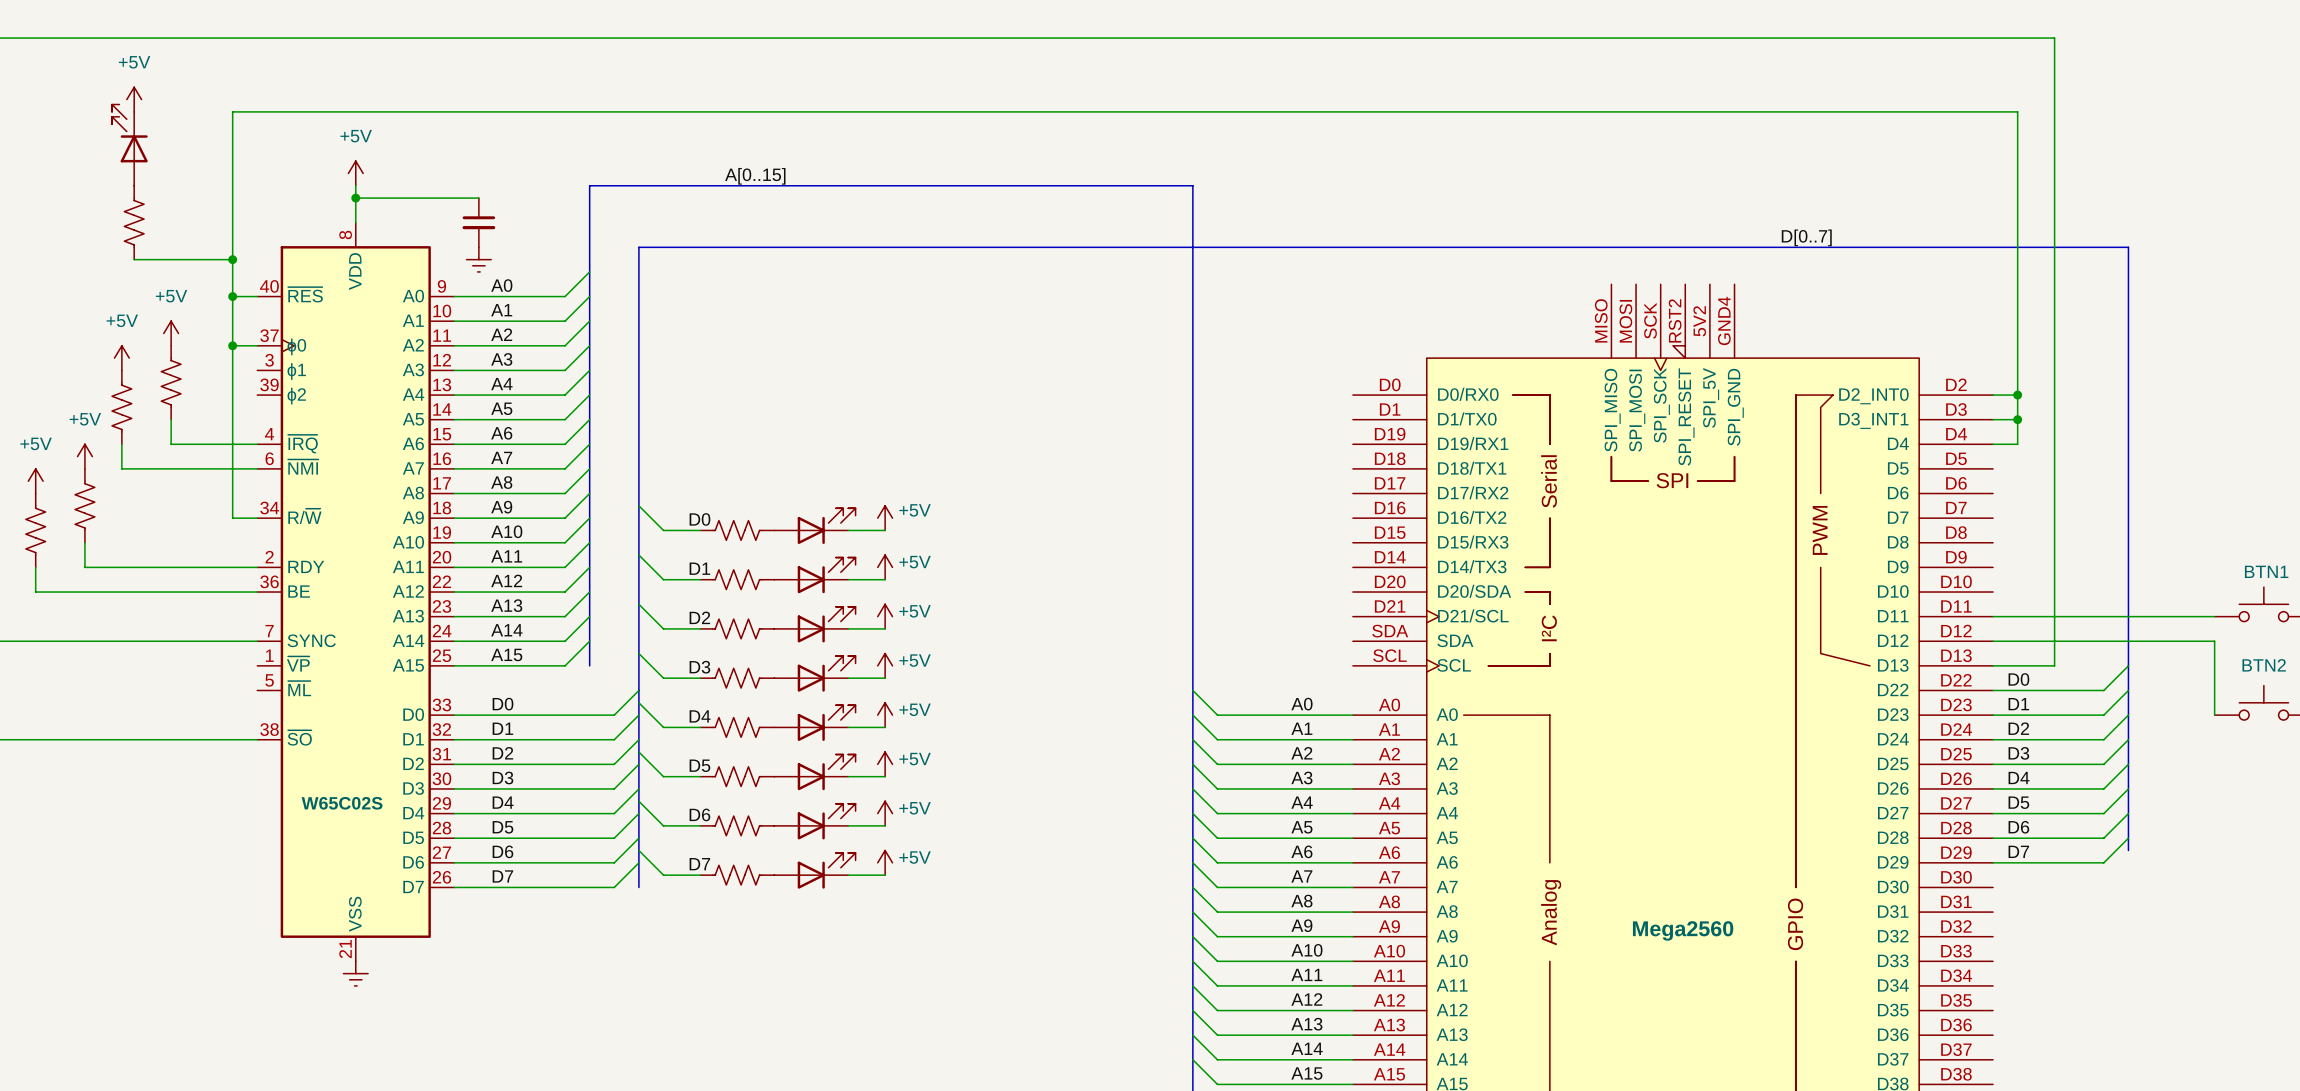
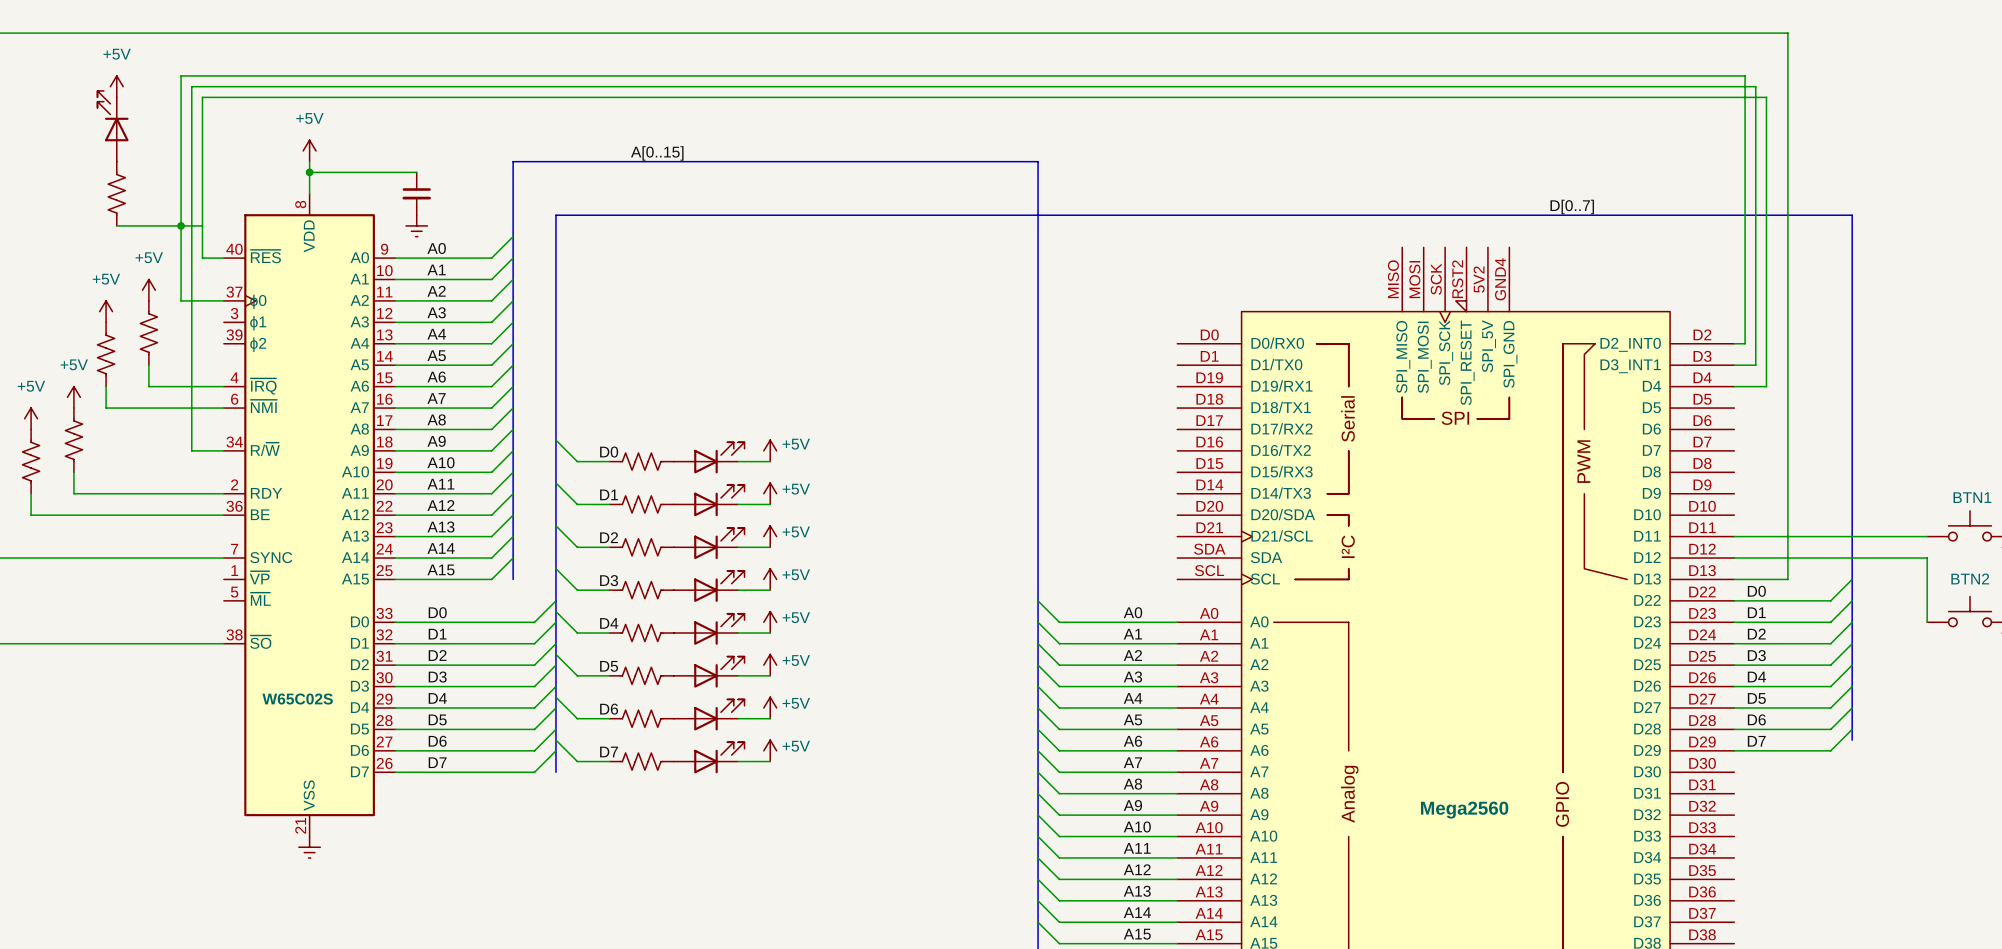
junction: none -> (181, 225)
junction: (232, 259) -> none
wire: (232, 296) (232, 518) -> none
junction: (232, 296) -> none
junction: (232, 345) -> none
wire: (2005, 395) (2017, 395) -> (1745, 343) (1745, 75) (181, 75) (181, 300) (202, 300)
junction: (2017, 395) -> none
wire: (2017, 419) (2017, 444) -> (202, 450) (191, 450) (191, 86) (1755, 86) (1755, 97) (1766, 97) (1766, 386) (1755, 386)
junction: (2017, 419) -> none

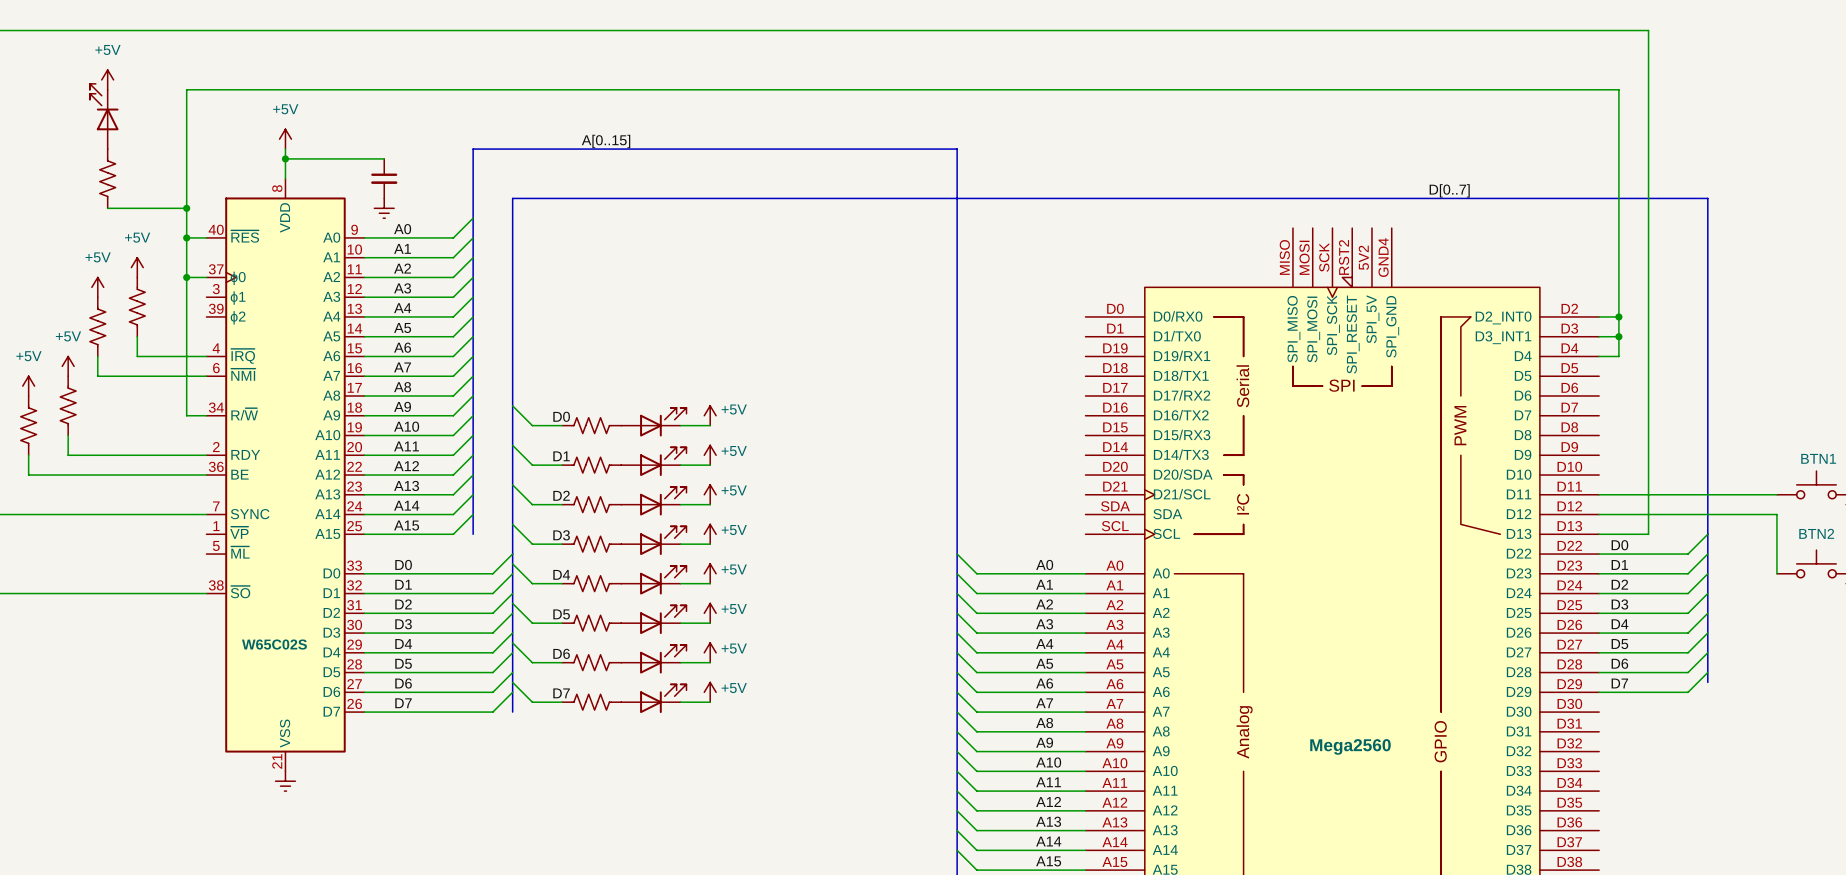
junction: (181, 225) -> none
junction: none -> (186, 208)
wire: none -> (186, 237) (186, 415)
junction: none -> (186, 237)
wire: (202, 300) (181, 300) (181, 75) (1745, 75) (1745, 343) -> (1618, 316) (1609, 316)
junction: none -> (186, 277)
junction: none -> (1618, 316)
junction: none -> (1618, 336)
wire: (1755, 386) (1766, 386) (1766, 97) (1755, 97) (1755, 86) (191, 86) (191, 450) (202, 450) -> (1618, 356) (1618, 336)

